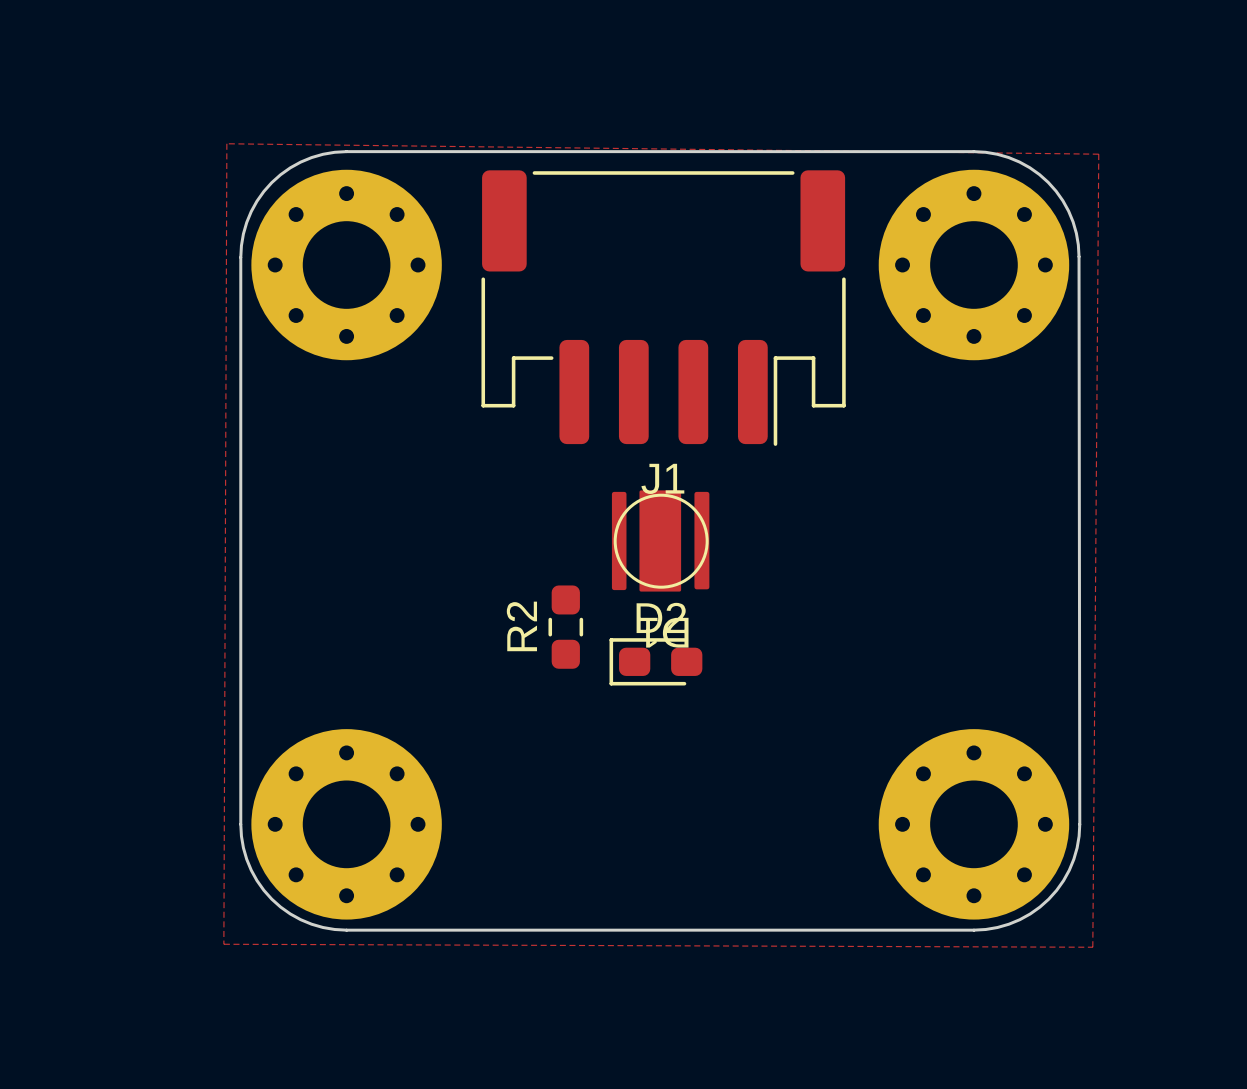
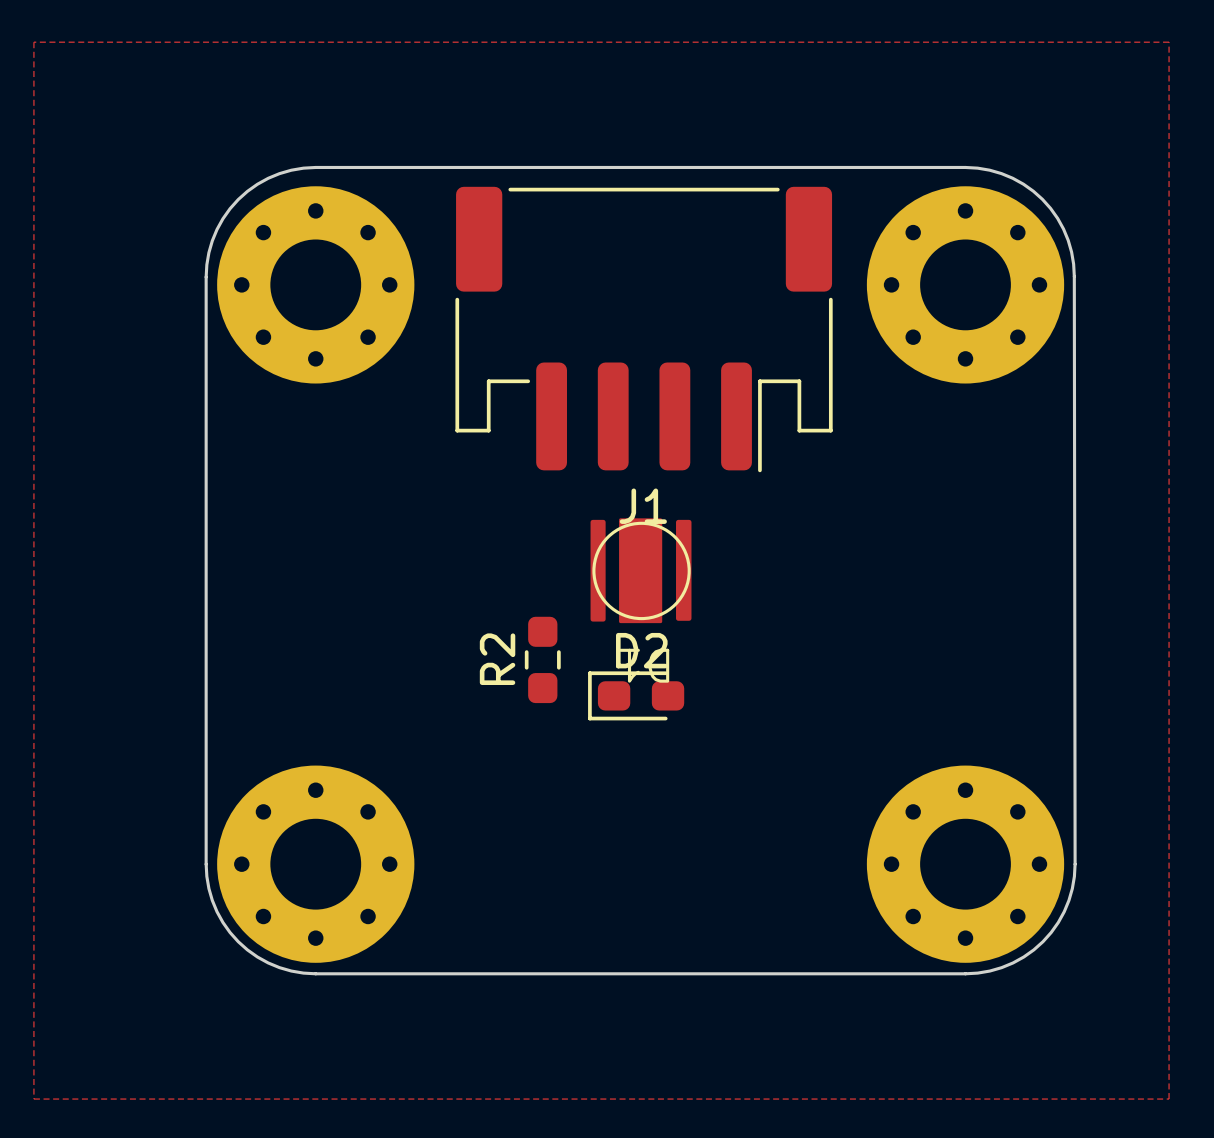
top zone outline: (226, 143) (1098, 154) (1092, 947) (223, 944) (226, 143) -> (33, 42) (33, 1099) (1169, 1099) (1169, 42) (33, 42)

